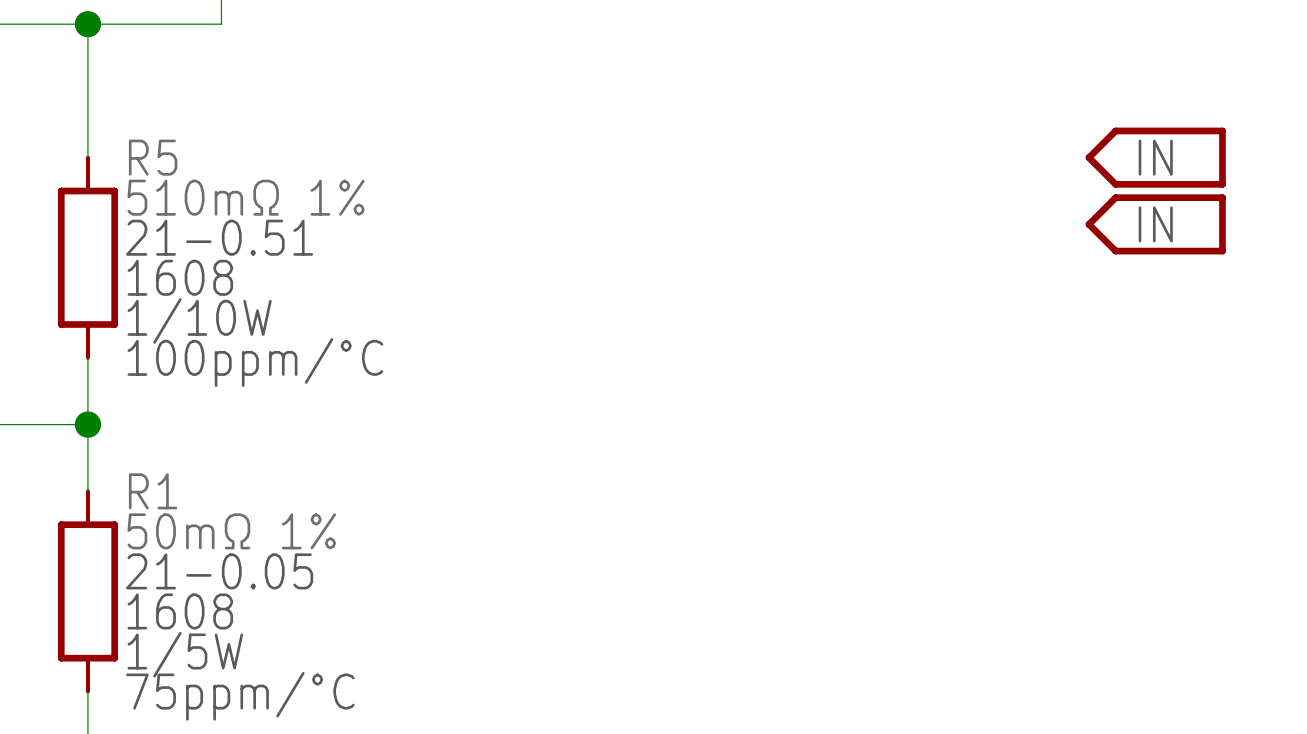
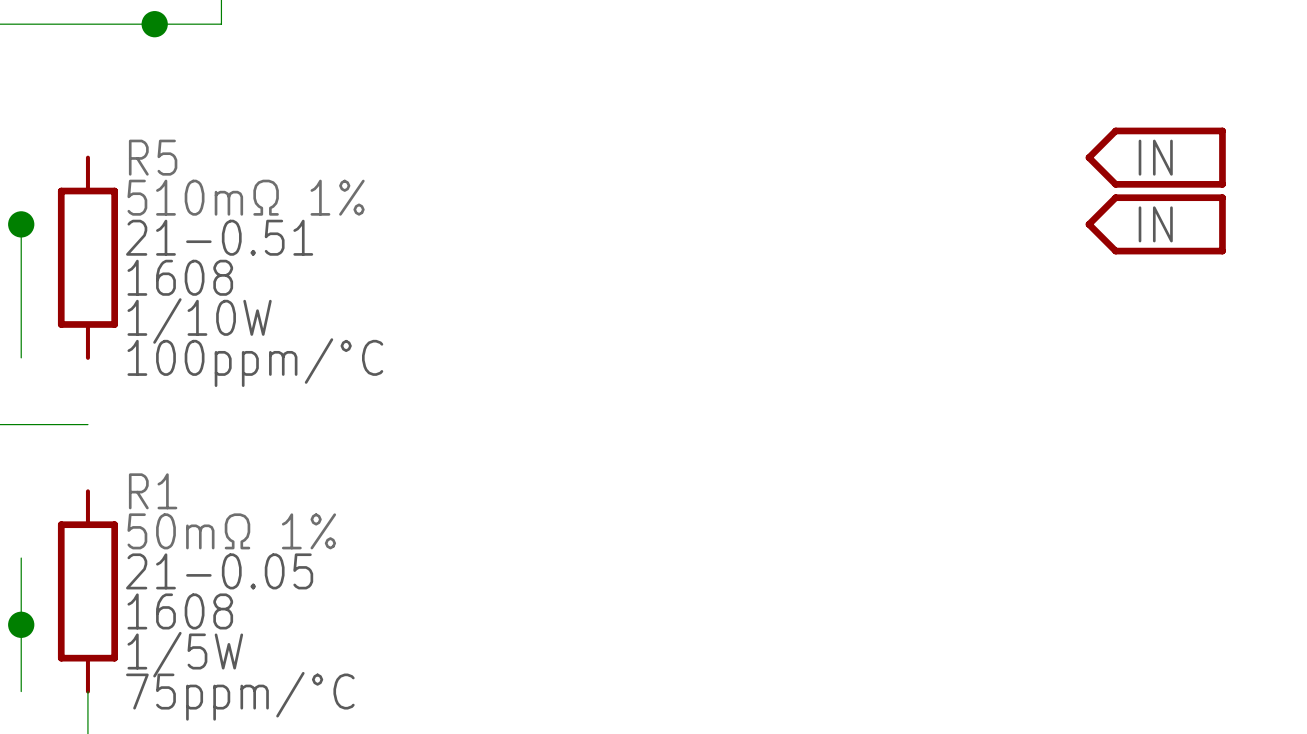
wire: (87, 24) (87, 157) -> (21, 224) (21, 357)
junction position: (87, 24) -> (154, 24)
junction: none -> (21, 224)
wire: (87, 357) (87, 491) -> (21, 558) (21, 691)
junction: (87, 424) -> none
junction: none -> (21, 624)

